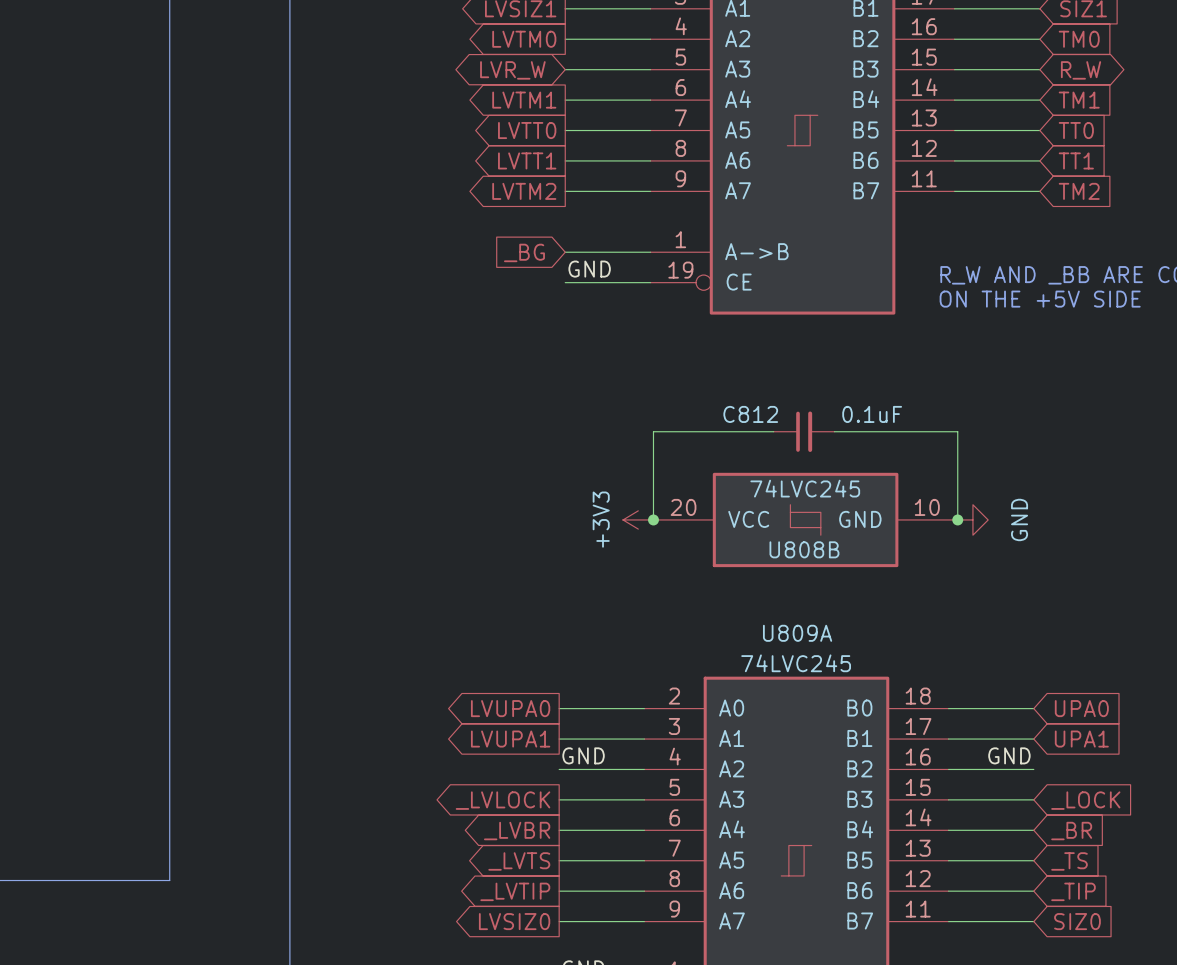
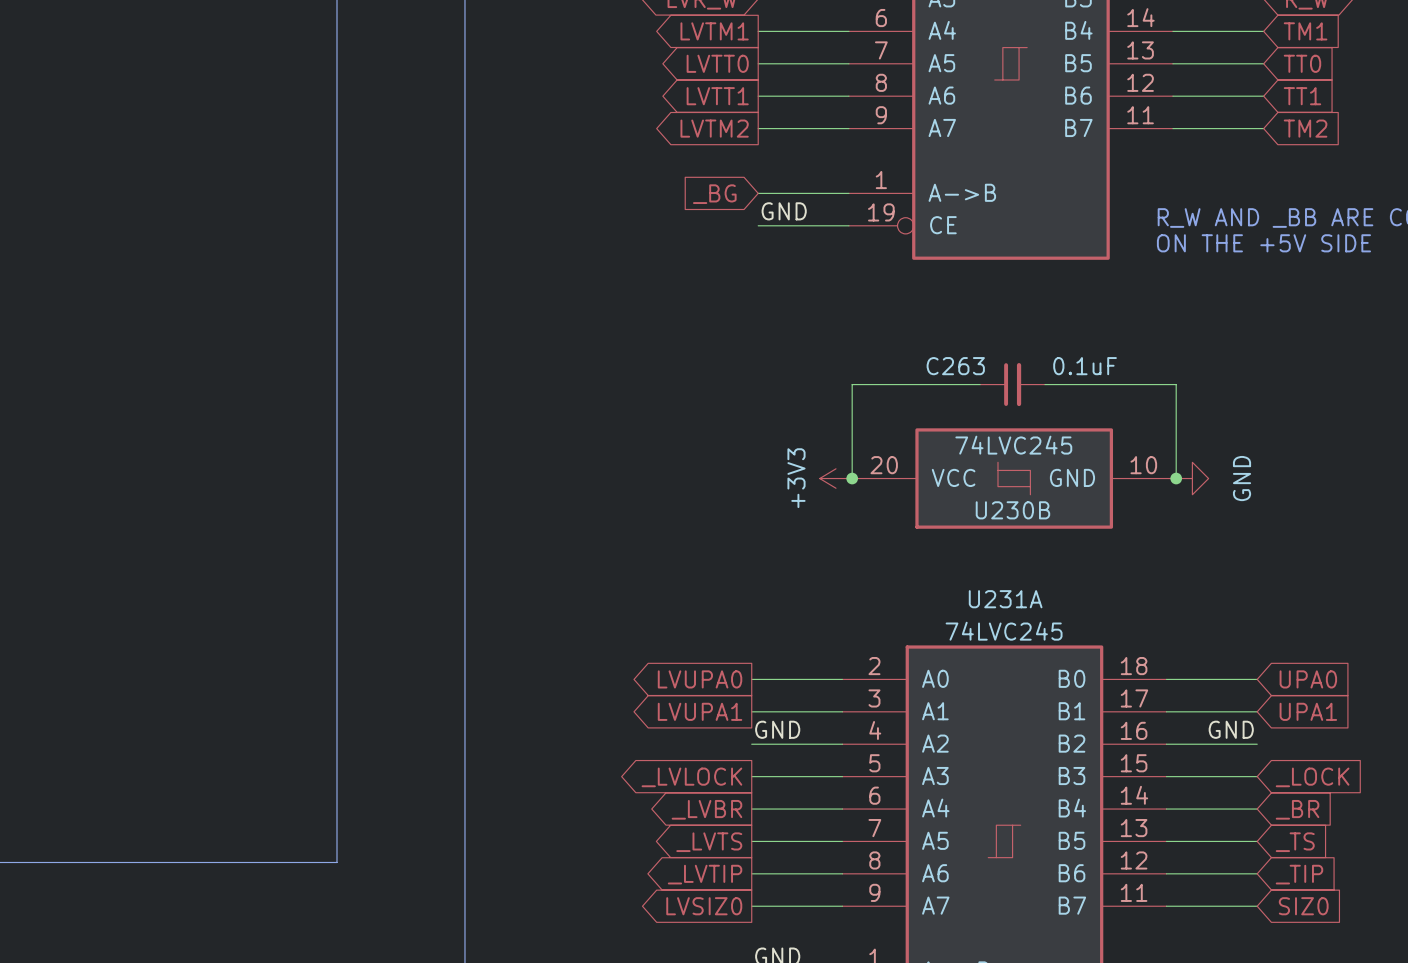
C812 name: C812 (750, 414) -> C263 (955, 366)
U808B name: U808B (804, 549) -> U230B (1012, 510)
U809A name: U809A (797, 633) -> U231A (1005, 599)

